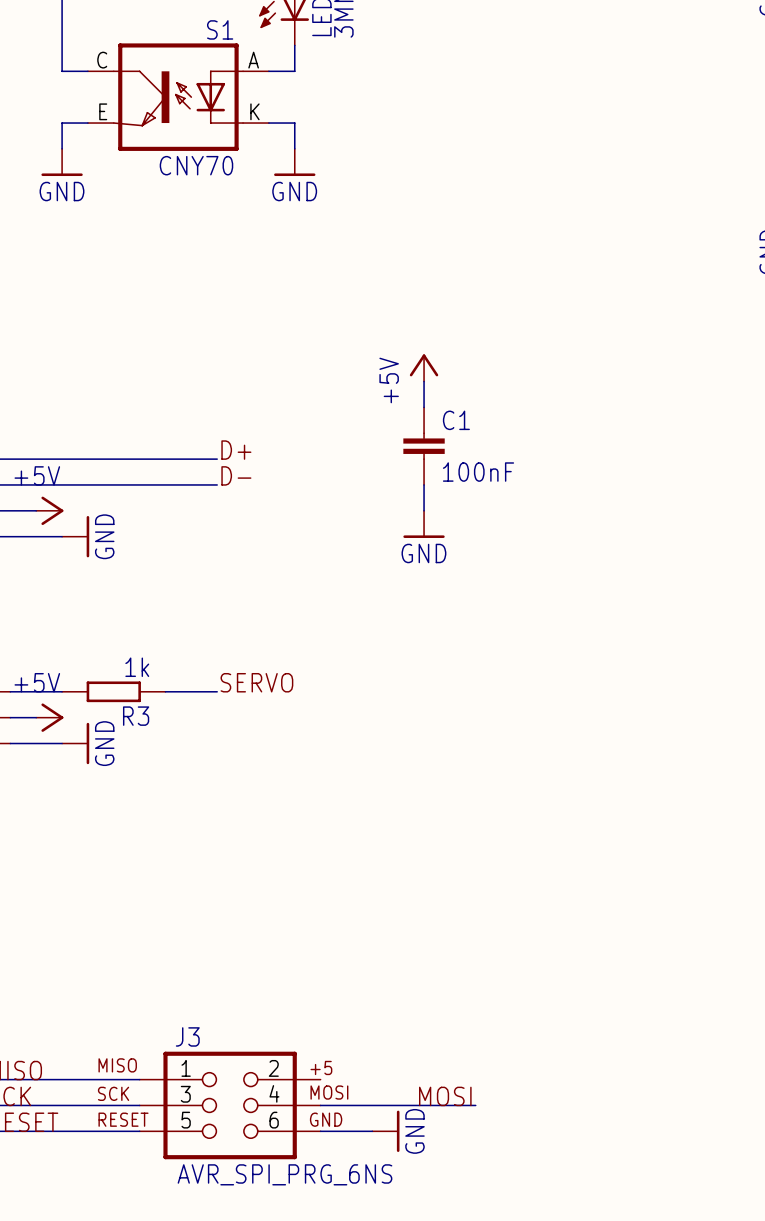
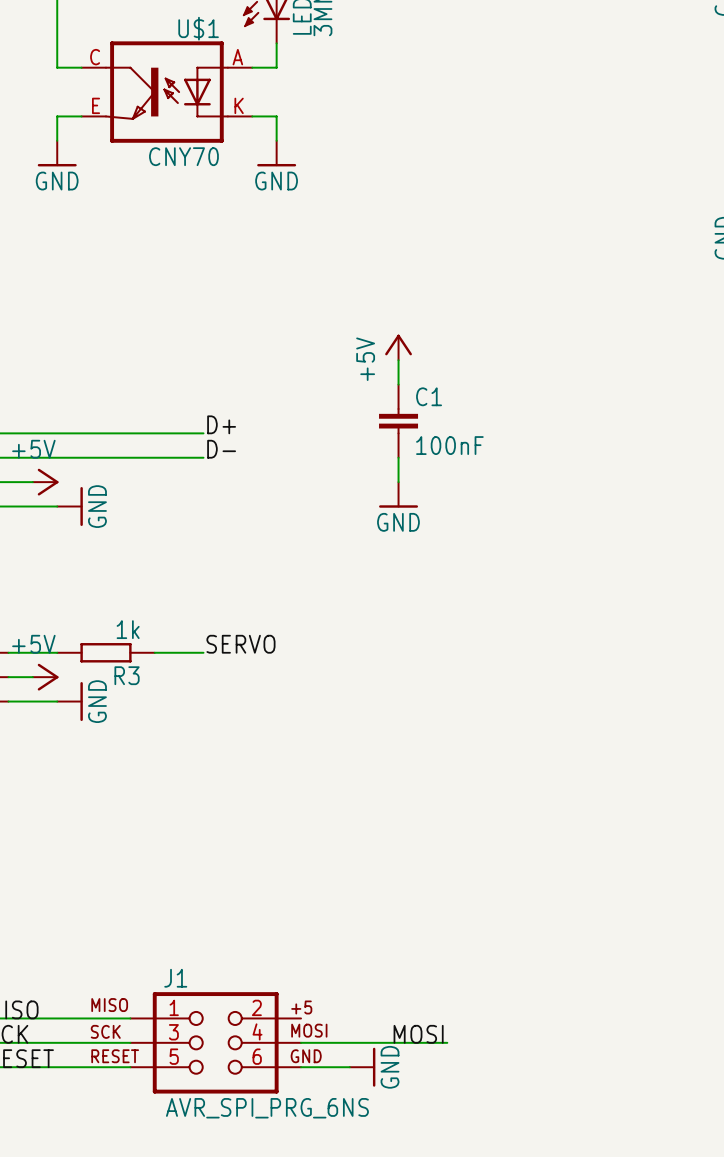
S1 name: S1 (220, 29) -> U$1 (198, 28)
J3 name: J3 (187, 1036) -> J1 (175, 978)

